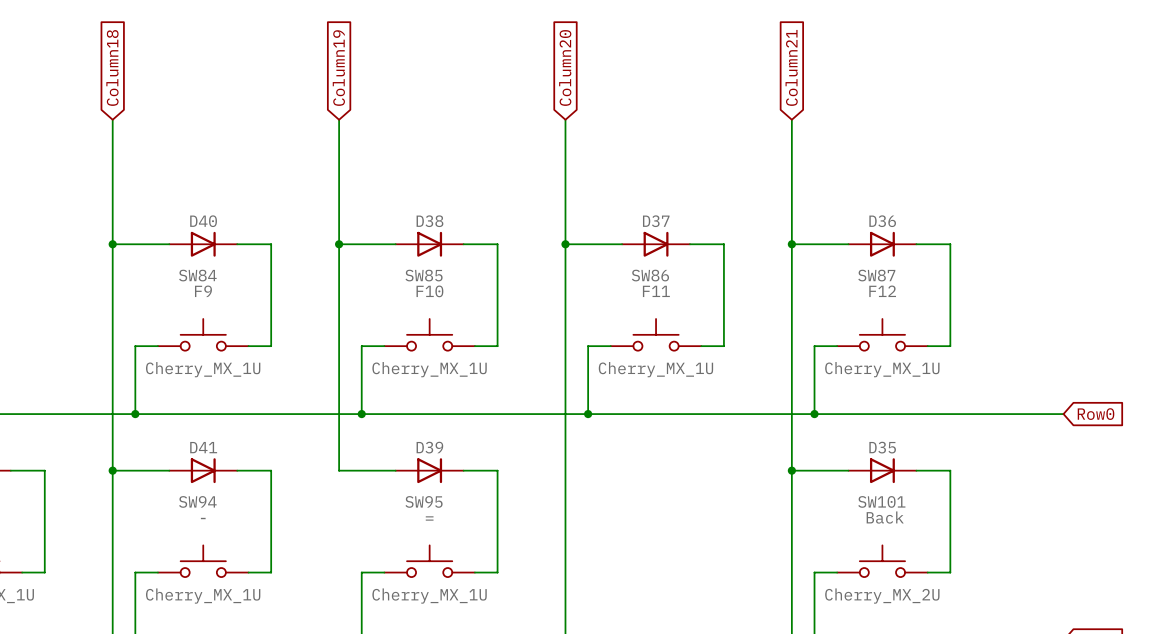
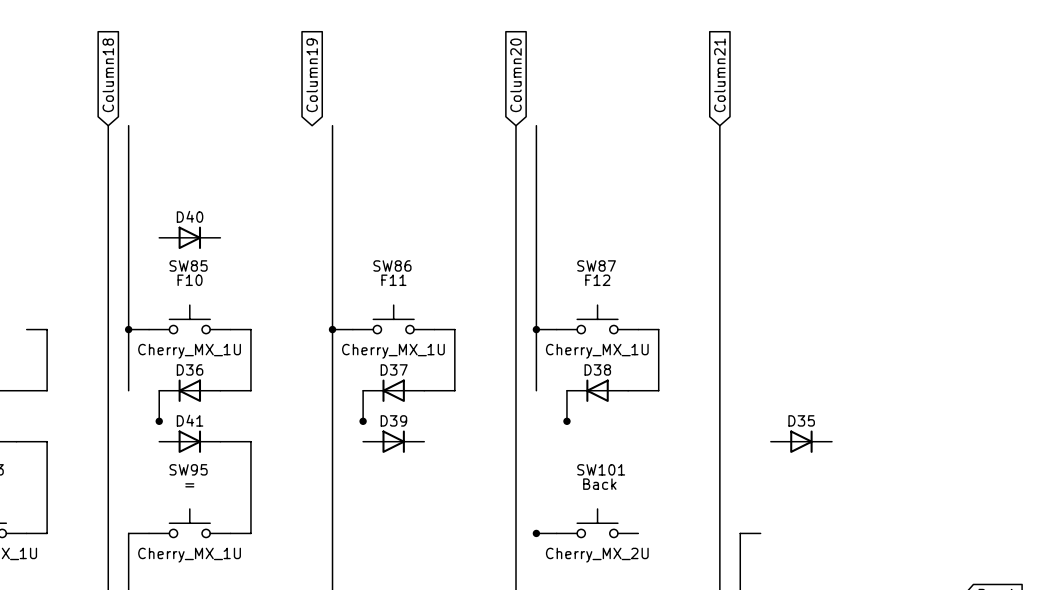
wire: none -> (128, 125) (128, 329)
wire: (339, 119) (339, 470) (395, 470) -> none
wire: none -> (332, 125) (332, 329)
wire: none -> (536, 125) (536, 329)
wire: (112, 244) (169, 244) -> none
junction: (112, 244) -> none
wire: (237, 244) (271, 244) (271, 346) -> (250, 390) (250, 329)
wire: (339, 244) (395, 244) -> none
junction: (339, 244) -> none
D38 rotation: 0° (429, 244) -> 180° (597, 390)
D38 position: (429, 244) -> (597, 390)
wire: (463, 244) (497, 244) (497, 346) -> (454, 390) (454, 329)
wire: (565, 244) (622, 244) -> none
junction: (565, 244) -> none
D37 rotation: 0° (656, 244) -> 180° (393, 390)
D37 position: (656, 244) -> (393, 390)
wire: (690, 244) (723, 244) (723, 346) -> (658, 390) (658, 329)
wire: (791, 244) (848, 244) -> none
junction: (791, 244) -> none
D36 rotation: 0° (882, 244) -> 180° (189, 390)
D36 position: (882, 244) -> (189, 390)
wire: (916, 244) (950, 244) (950, 346) (927, 346) -> none
SW84 name: SW84 (197, 275) -> SW85 (188, 265)
SW85 name: SW85 (424, 275) -> SW86 (392, 265)
SW86 name: SW86 (650, 275) -> SW87 (596, 265)
SW84 value: F9 (203, 291) -> F10 (190, 280)
SW85 value: F10 (429, 291) -> F11 (393, 280)
SW86 value: F11 (656, 291) -> F12 (597, 280)
SW87: F12 (882, 334) -> none
junction: none -> (128, 329)
junction: none -> (332, 329)
junction: none -> (536, 329)
wire: (837, 346) (814, 346) (814, 414) -> none
wire: (44, 414) (237, 414) -> (47, 390) (47, 329) (26, 329)
junction: (135, 414) -> none
wire: none -> (159, 390) (159, 421)
wire: (271, 414) (463, 414) -> none
junction: (361, 414) -> none
wire: none -> (363, 390) (363, 421)
wire: (497, 414) (690, 414) -> none
junction: (588, 414) -> none
wire: none -> (566, 390) (566, 421)
wire: (723, 414) (1063, 414) -> none
junction: (814, 414) -> none
global label: Row0 (1096, 414) -> none
junction: none -> (159, 421)
junction: none -> (363, 421)
junction: none -> (566, 421)
wire: (112, 470) (169, 470) -> none
junction: (112, 470) -> none
wire: (463, 470) (497, 470) (497, 572) (474, 572) -> none
wire: (791, 470) (848, 470) -> none
junction: (791, 470) -> none
wire: (916, 470) (950, 470) (950, 572) (927, 572) -> none
SW94 name: SW94 (197, 501) -> SW95 (188, 469)
SW94 value: - (203, 518) -> = (189, 485)
SW95: = (429, 561) -> none
SW101 position: (882, 561) -> (597, 523)
wire: (361, 572) (384, 572) -> (332, 533) (332, 390)
wire: none -> (536, 533) (556, 533)
junction: none -> (536, 533)

